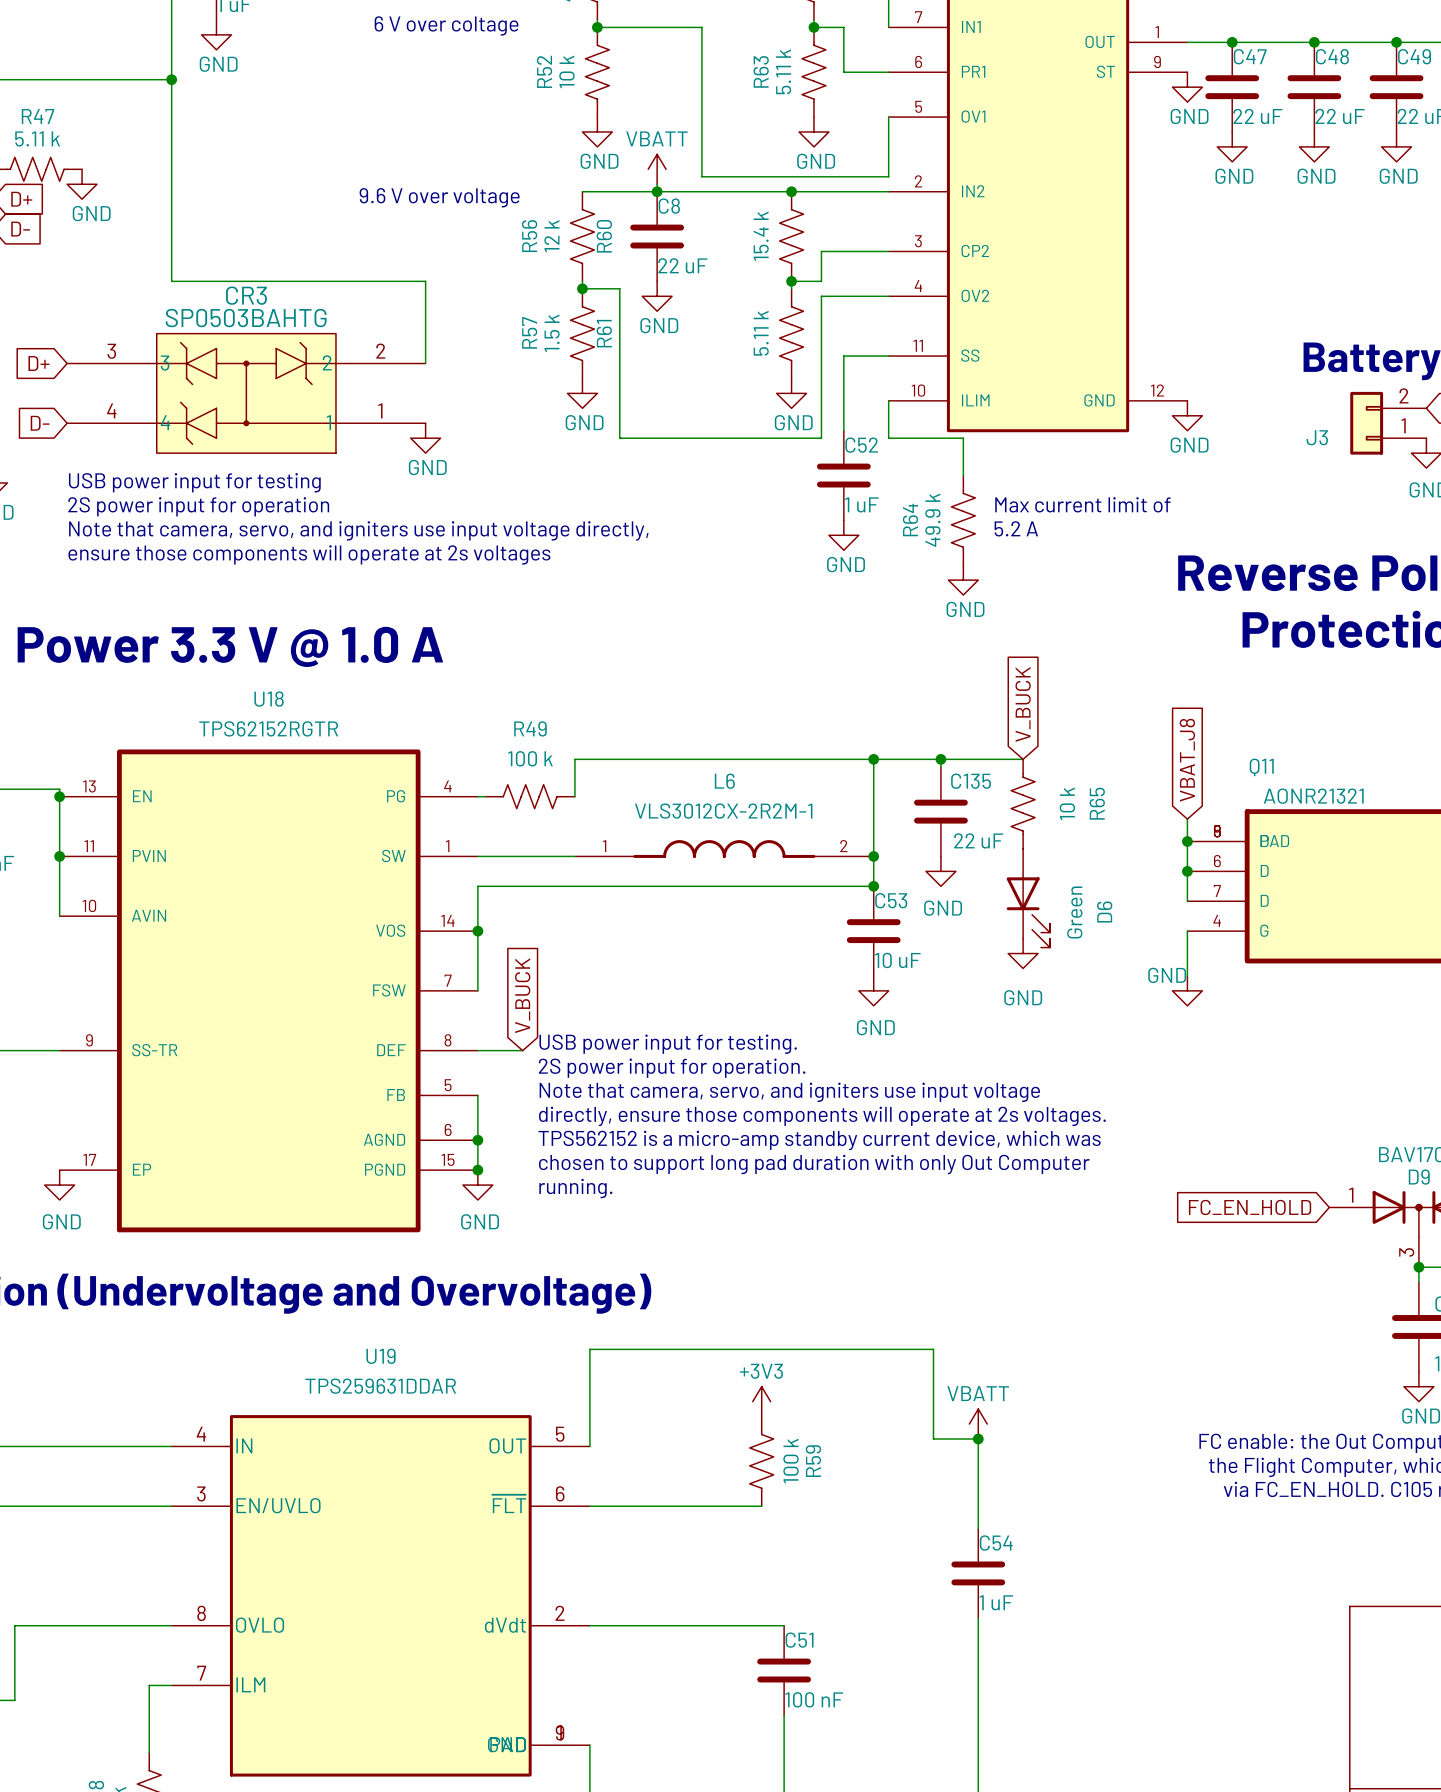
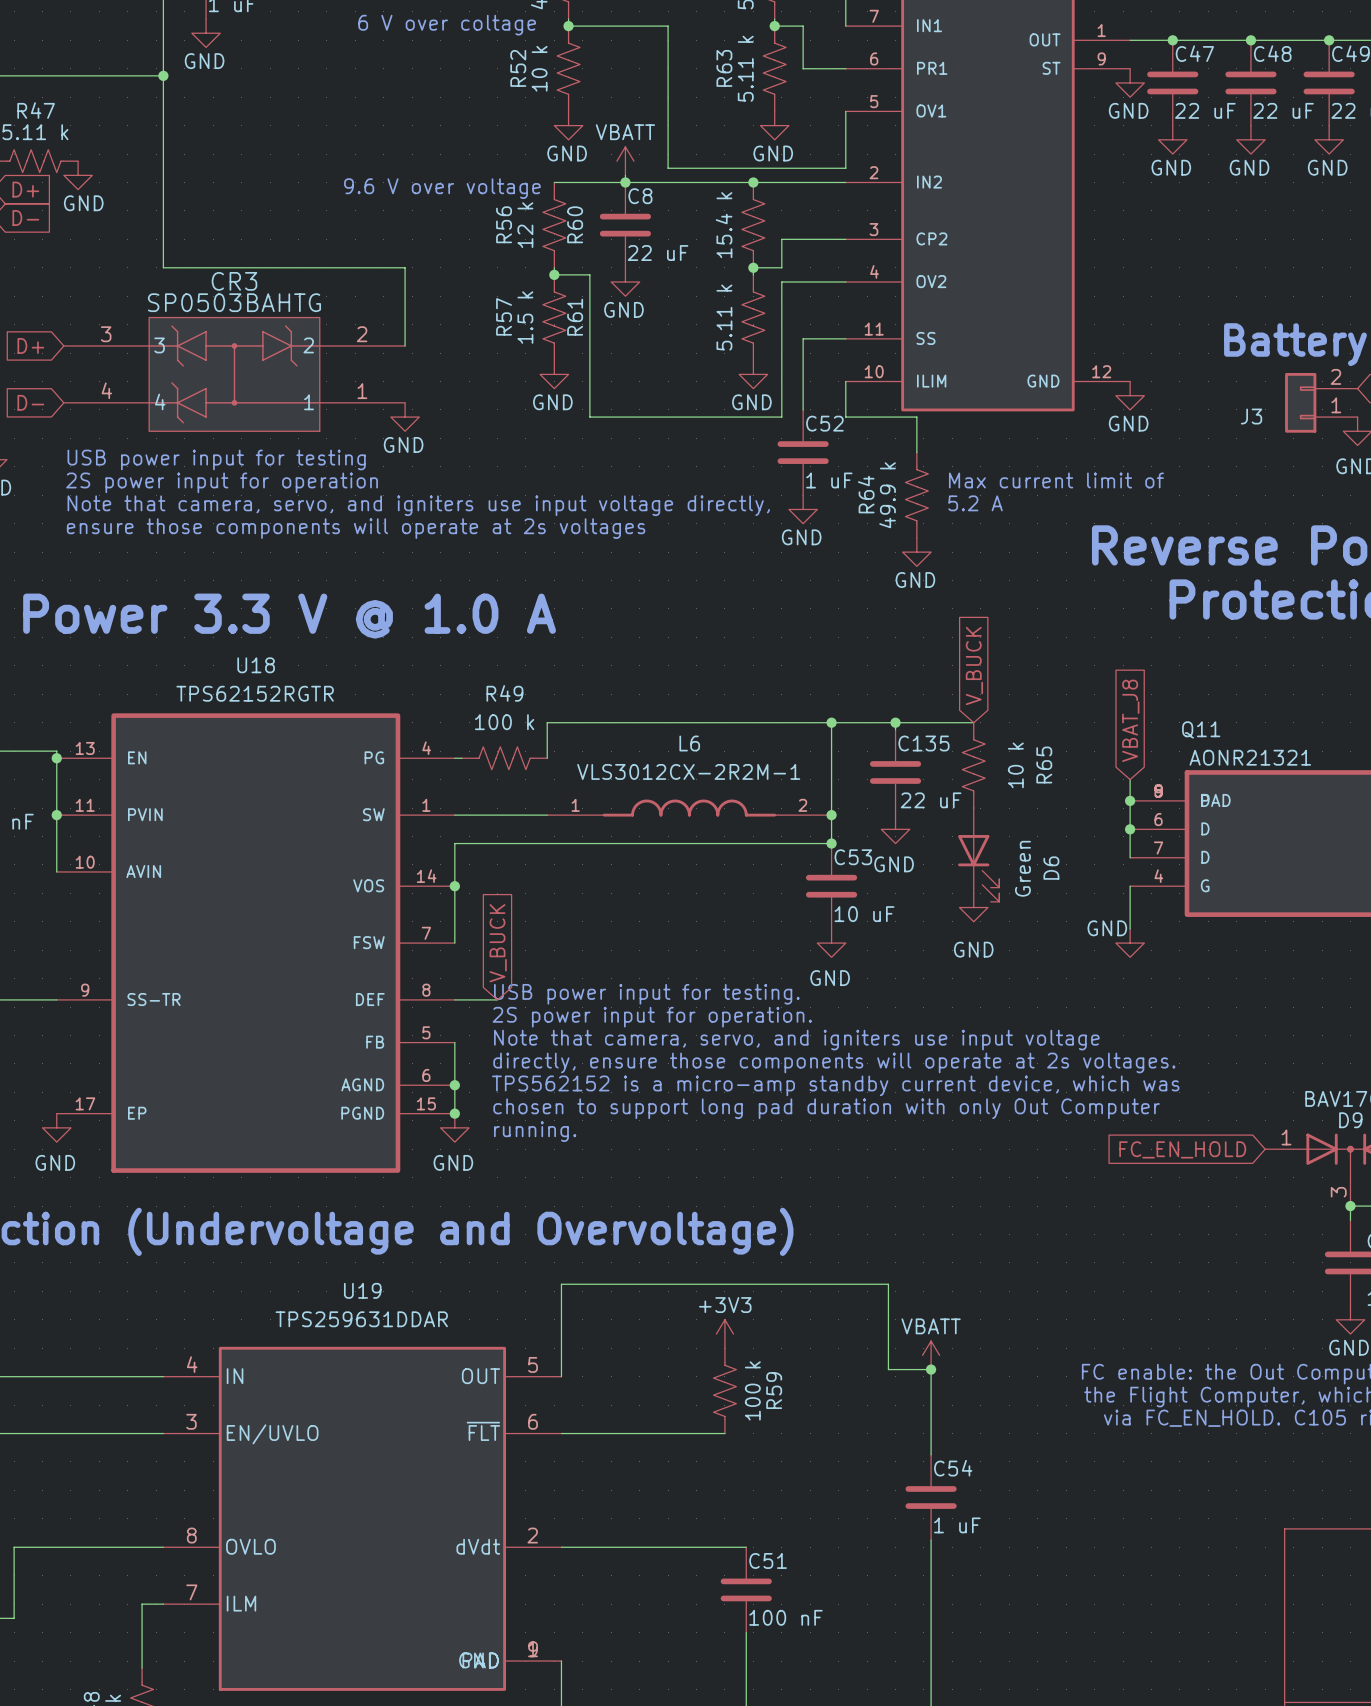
text position: USB power input for testing. (668, 1044) -> USB power input for testing. (646, 994)
text position: 2S power input for operation. (672, 1068) -> 2S power input for operation. (652, 1017)
text position: Note that camera, servo, and igniters use input voltage (789, 1092) -> Note that camera, servo, and igniters use input voltage (796, 1040)
text position: directly, ensure those components will operate at 2s voltages. (822, 1116) -> directly, ensure those components will operate at 2s voltages. (834, 1062)
text position: TPS562152 is a micro-amp standby current device, which was (819, 1140) -> TPS562152 is a micro-amp standby current device, which was (835, 1085)
text position: chosen to support long pad duration with only Out Computer (814, 1164) -> chosen to support long pad duration with only Out Computer (826, 1108)
text position: running. (575, 1188) -> running. (535, 1131)

